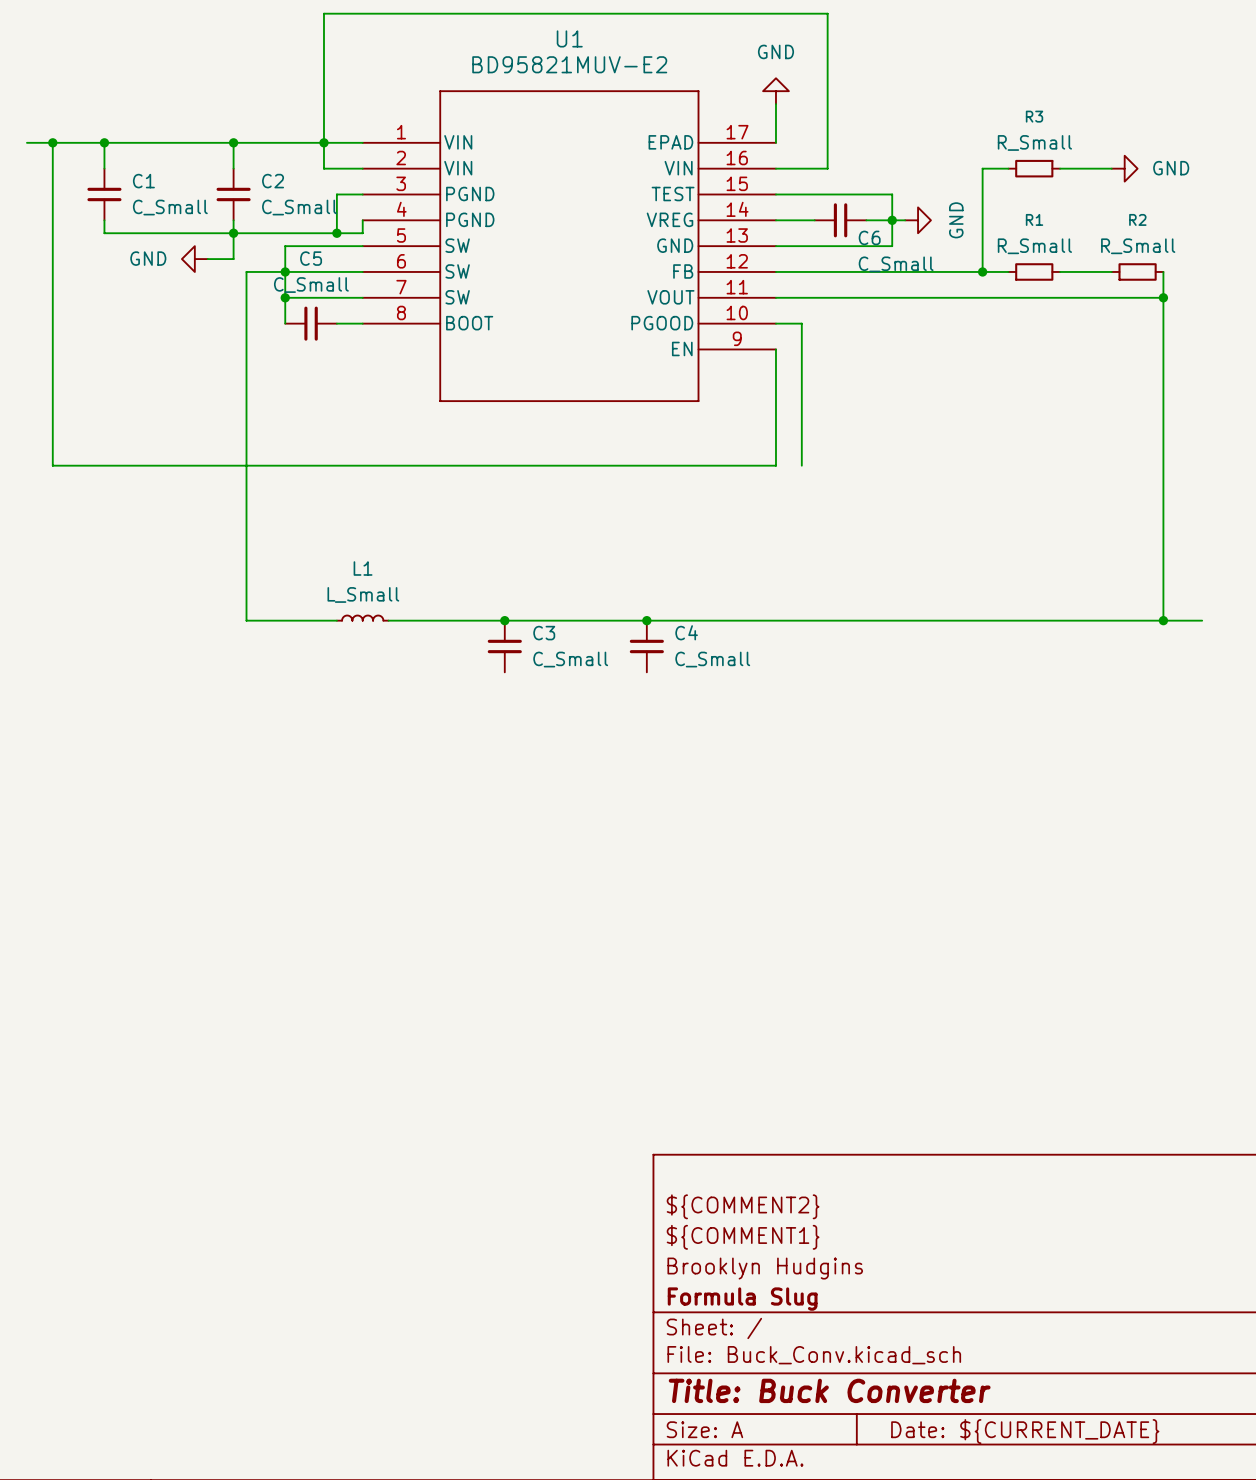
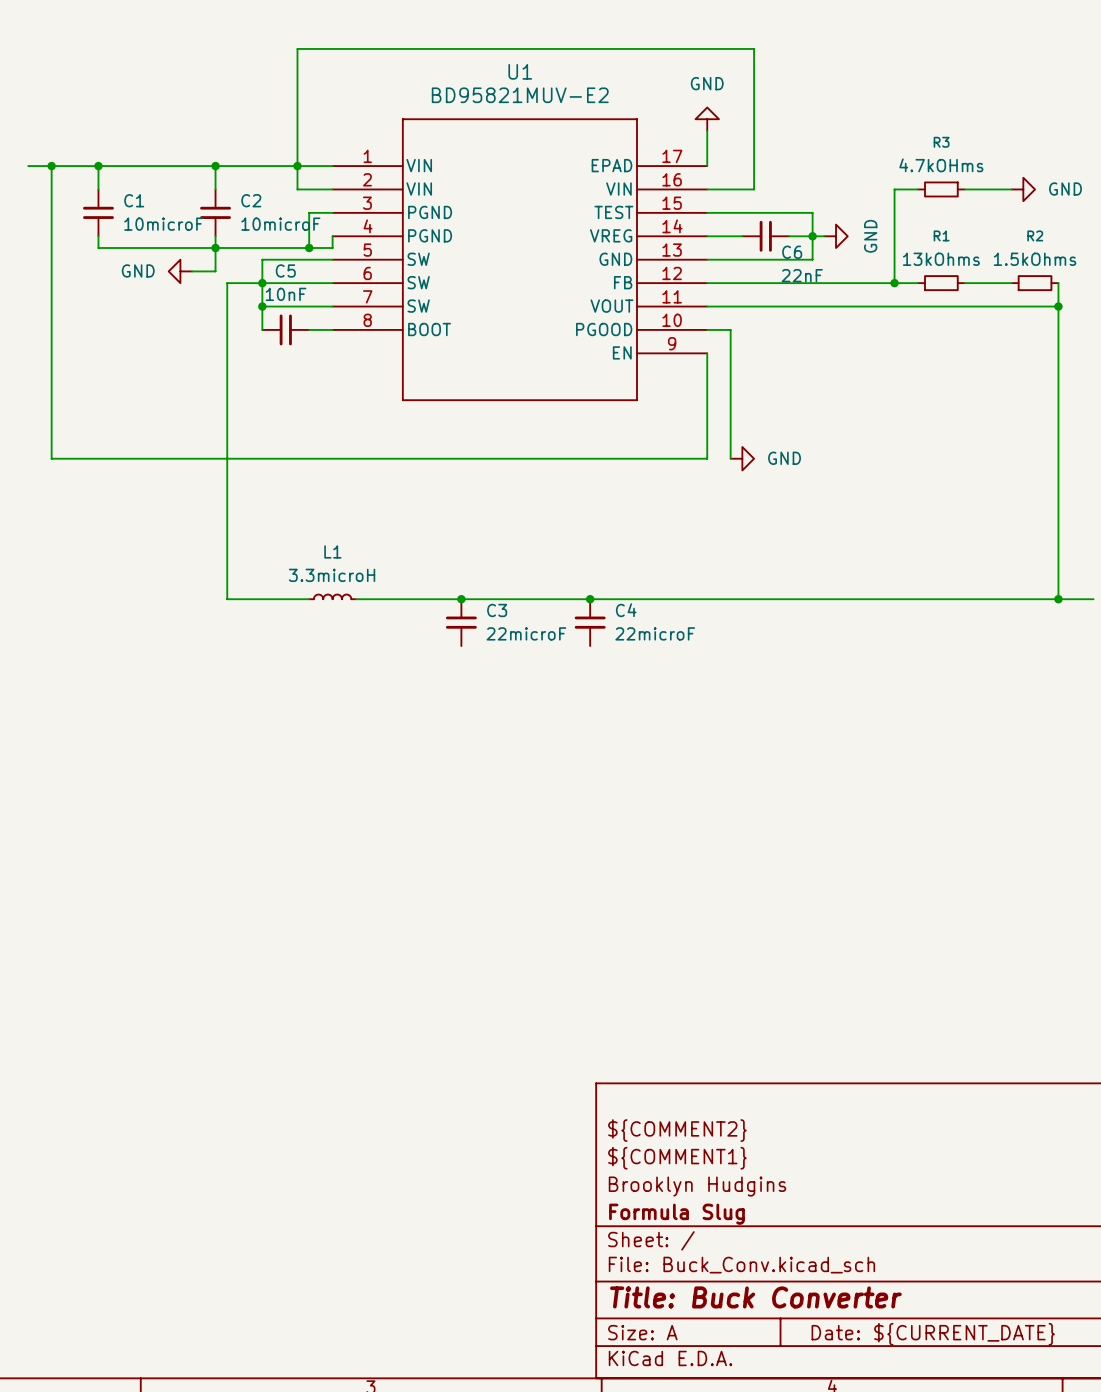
R3 value: R_Small (1034, 142) -> 4.7kOHms (941, 165)
C1 value: C_Small (170, 207) -> 10microF (163, 224)
C2 value: C_Small (299, 207) -> 10microF (280, 224)
R1 value: R_Small (1034, 246) -> 13kOhms (941, 259)
R2 value: R_Small (1138, 246) -> 1.5kOhms (1035, 259)
C6 value: C_Small (896, 264) -> 22nF (802, 275)
C5 value: C_Small (311, 285) -> 10nF (286, 294)
power symbol: none -> GND (742, 458)
L1 value: L_Small (363, 594) -> 3.3microH (332, 575)
C3 value: C_Small (570, 659) -> 22microF (526, 633)
C4 value: C_Small (712, 659) -> 22microF (655, 633)

